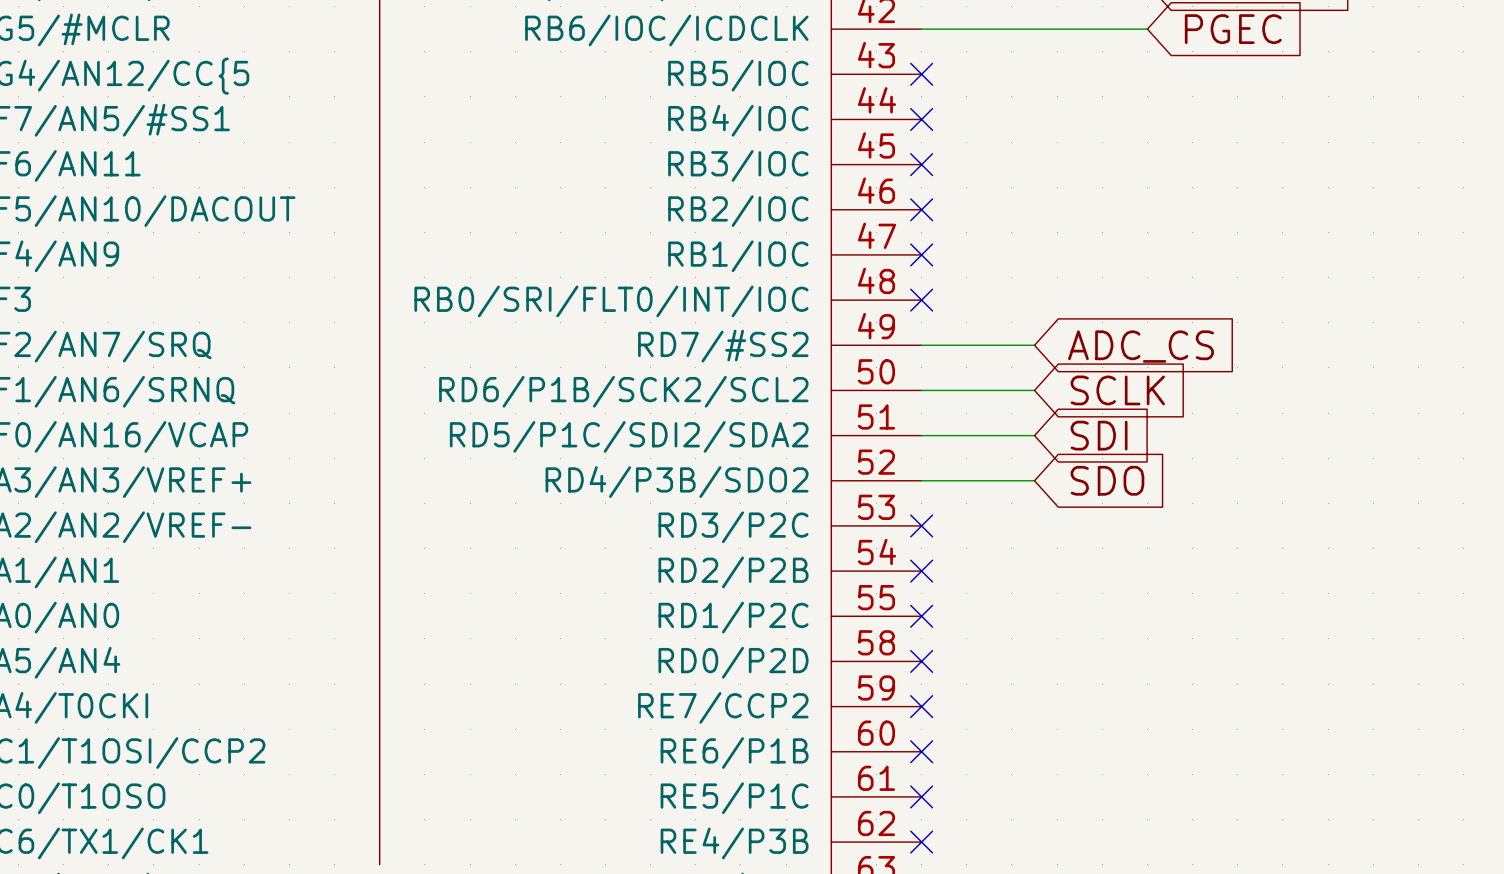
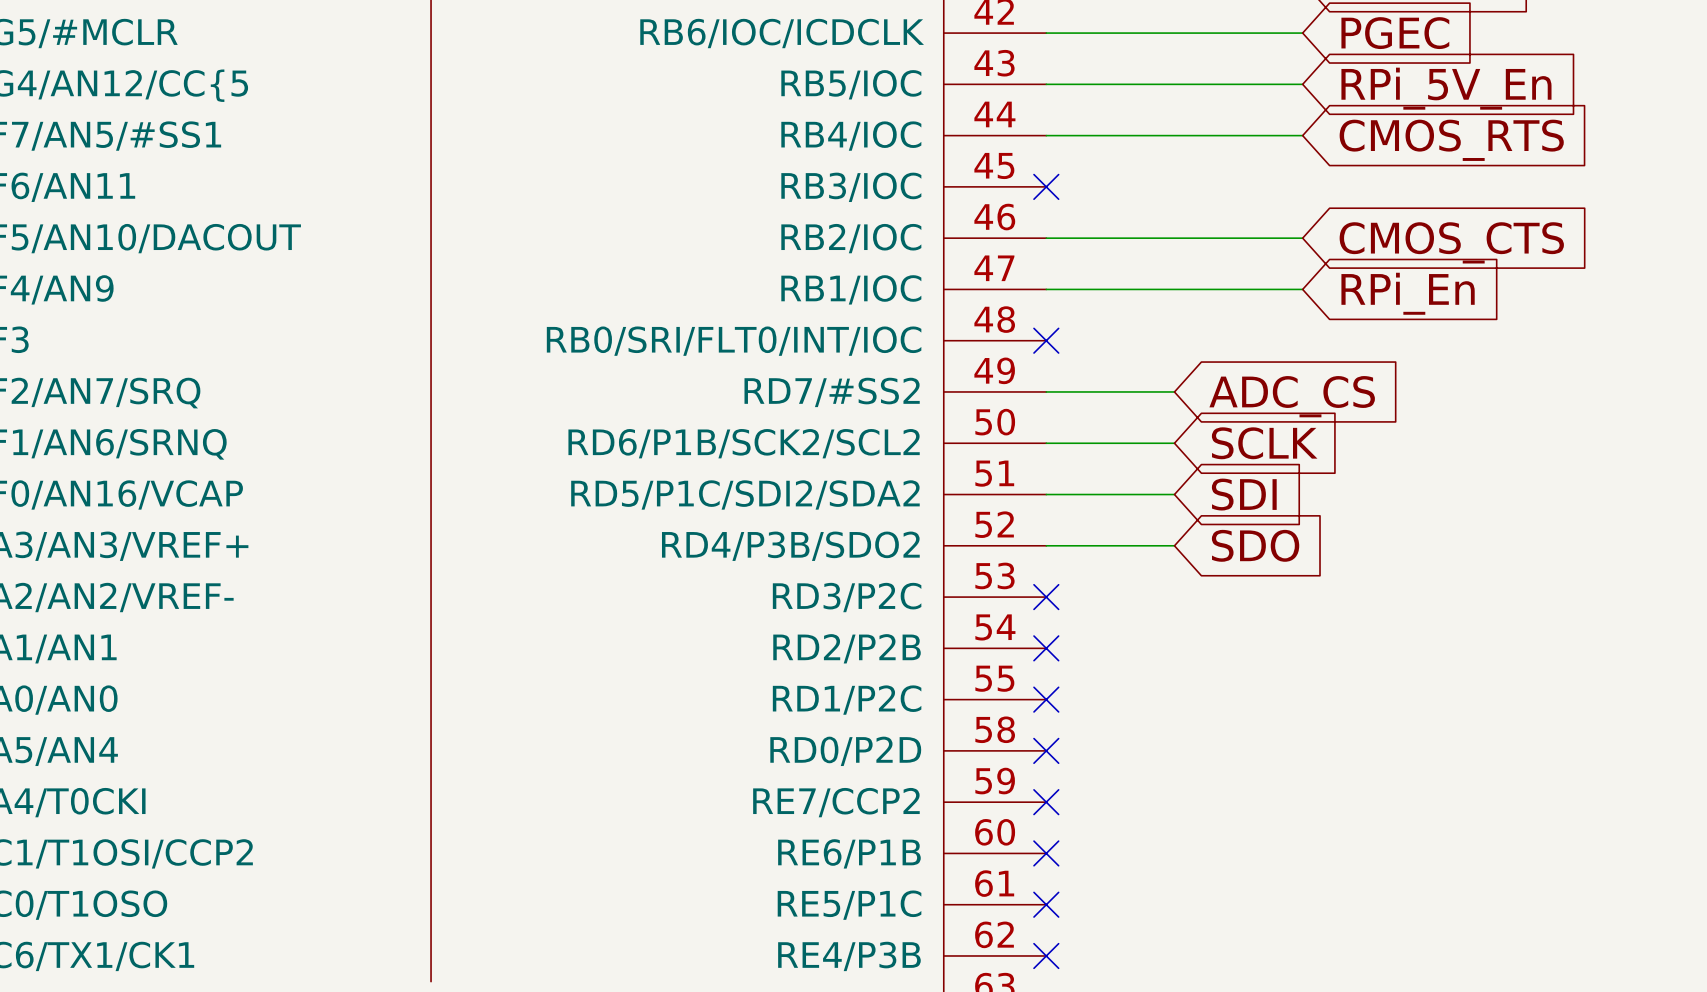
wire: none -> (1046, 84) (1302, 84)
no-connect mark: (921, 74) -> none
global label: none -> RPi_5V_En (1446, 88)
wire: none -> (1046, 135) (1302, 135)
no-connect mark: (921, 119) -> none
global label: none -> CMOS_RTS (1451, 140)
wire: none -> (1046, 238) (1302, 238)
no-connect mark: (921, 209) -> none
global label: none -> CMOS_CTS (1451, 242)
wire: none -> (1046, 289) (1302, 289)
no-connect mark: (921, 254) -> none
global label: none -> RPi_En (1408, 293)

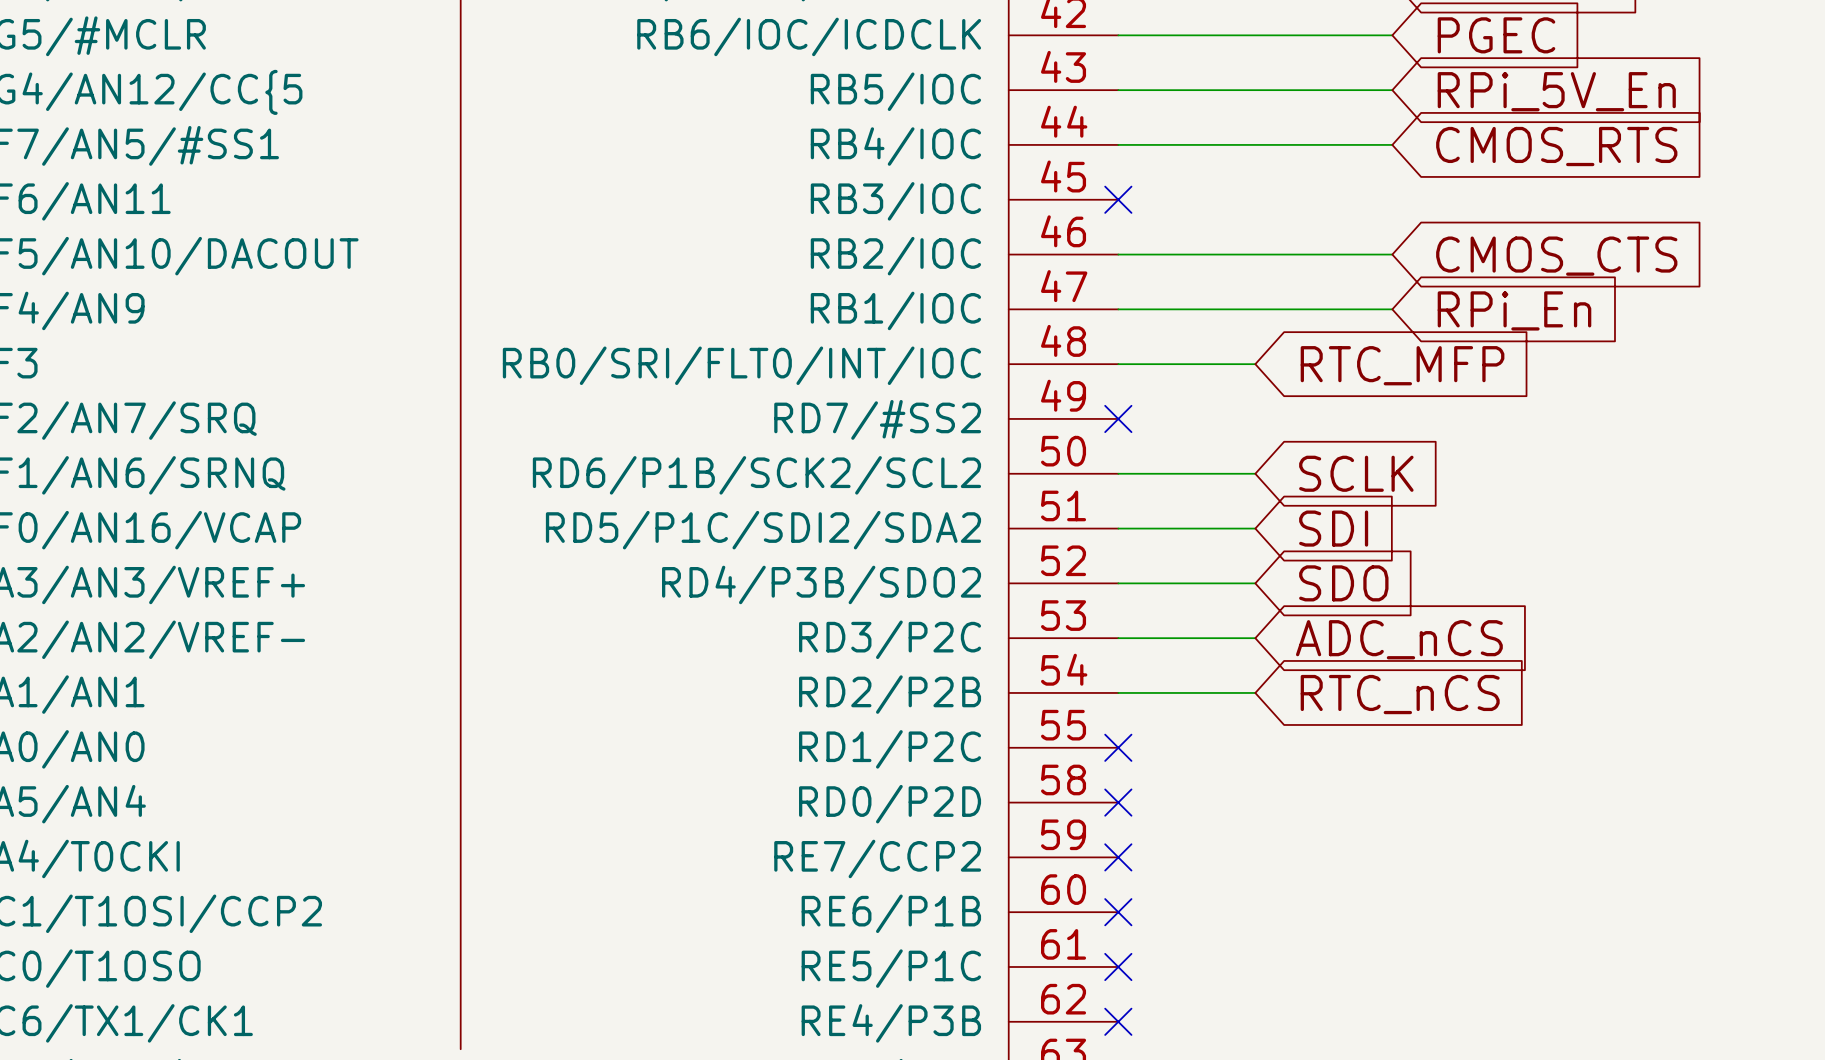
no-connect mark position: (1046, 340) -> (1118, 418)
global label: none -> RTC_MFP (1402, 365)
wire: (1046, 391) (1174, 391) -> (1118, 364) (1255, 364)
global label: ADC_CS (1292, 396) -> none
wire: none -> (1118, 638) (1255, 638)
no-connect mark: (1046, 597) -> none
global label: none -> ADC_nCS (1399, 639)
wire: none -> (1118, 692) (1255, 692)
no-connect mark: (1046, 648) -> none
global label: none -> RTC_nCS (1400, 694)

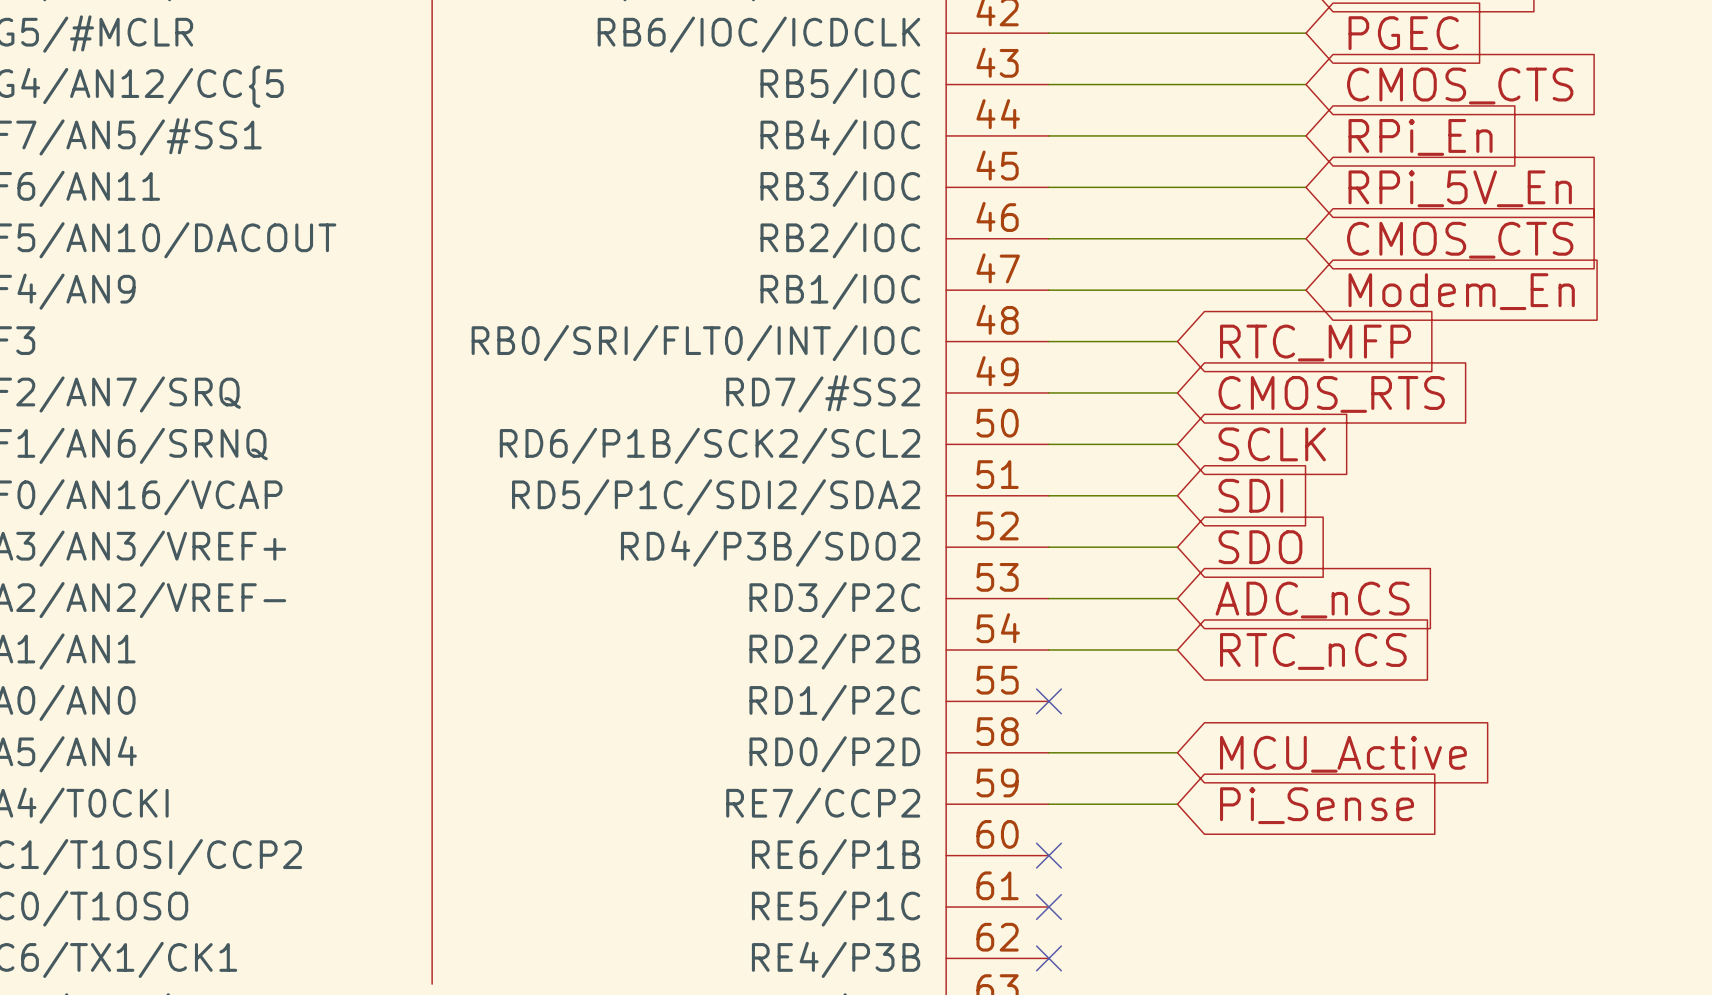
global label: RPi_5V_En (1556, 91) -> CMOS_CTS (1460, 86)
global label: CMOS_RTS (1556, 146) -> RPi_En (1420, 137)
wire: none -> (1048, 187) (1305, 187)
no-connect mark: (1118, 199) -> none
global label: none -> RPi_5V_En (1460, 188)
global label: RPi_En (1514, 310) -> Modem_En (1461, 291)
wire: none -> (1048, 392) (1177, 392)
no-connect mark: (1118, 418) -> none
global label: none -> CMOS_RTS (1331, 394)
wire: none -> (1048, 752) (1177, 752)
no-connect mark: (1118, 802) -> none
global label: none -> MCU_Active (1343, 754)
wire: none -> (1048, 804) (1177, 804)
no-connect mark: (1118, 857) -> none
global label: none -> Pi_Sense (1317, 805)

